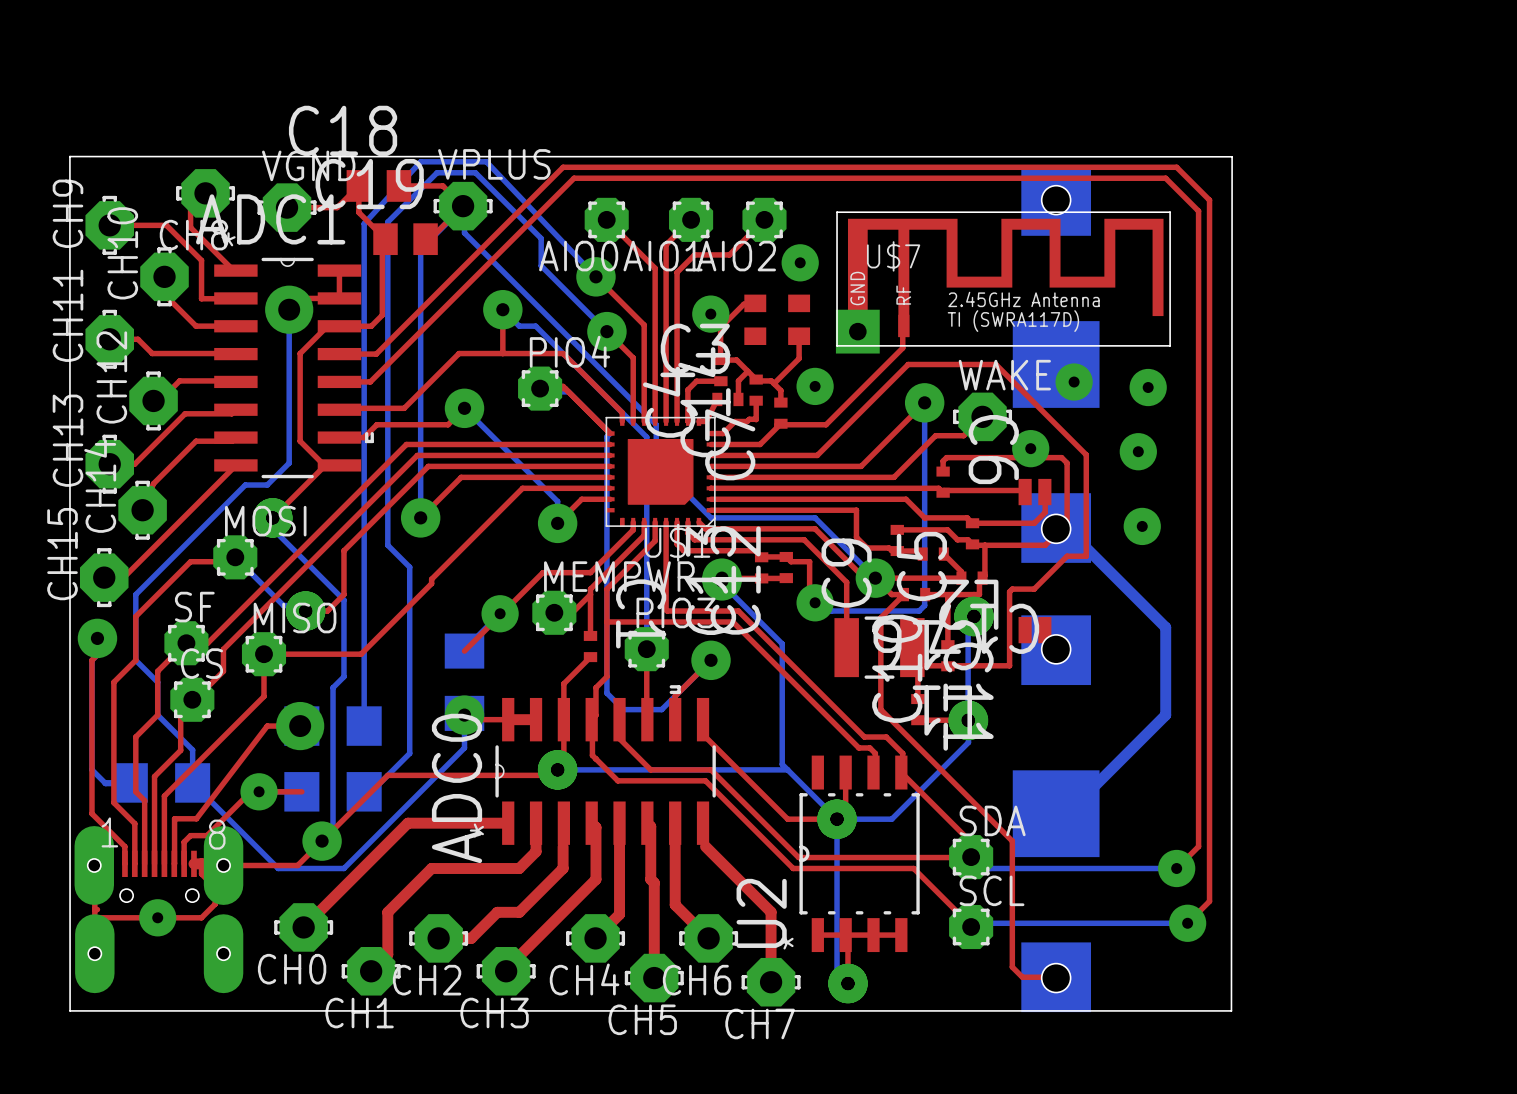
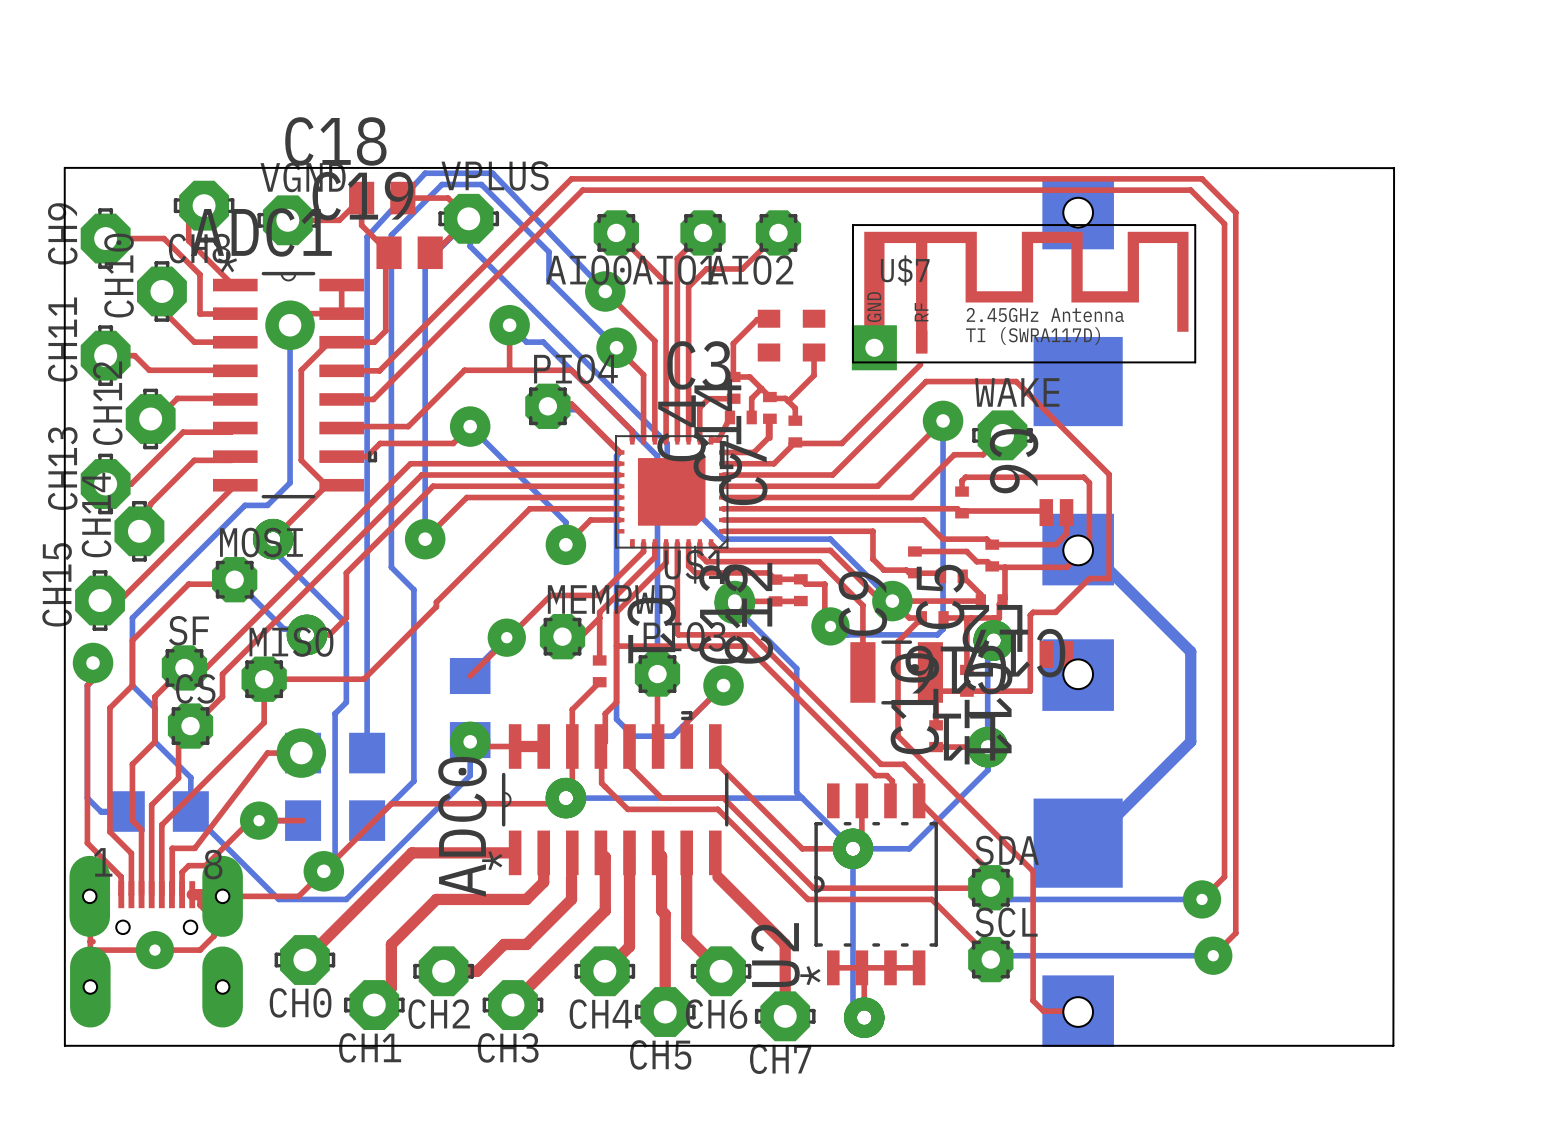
board edge: (1232, 156) (1231, 1010) -> (1258, 168) (1394, 168) (1393, 1045) (1258, 1045)
via: (800, 262) -> none
via: (710, 314) -> none
top track: (902, 331) (902, 348) -> none
via: (1074, 382) -> none
via: (815, 386) -> none
via: (1148, 387) -> none
top track: (755, 419) (735, 421) (723, 433) -> (769, 418) (768, 437) (753, 452) (735, 452)
via: (1030, 448) -> none
via: (1138, 451) -> none
via: (1142, 526) -> none

